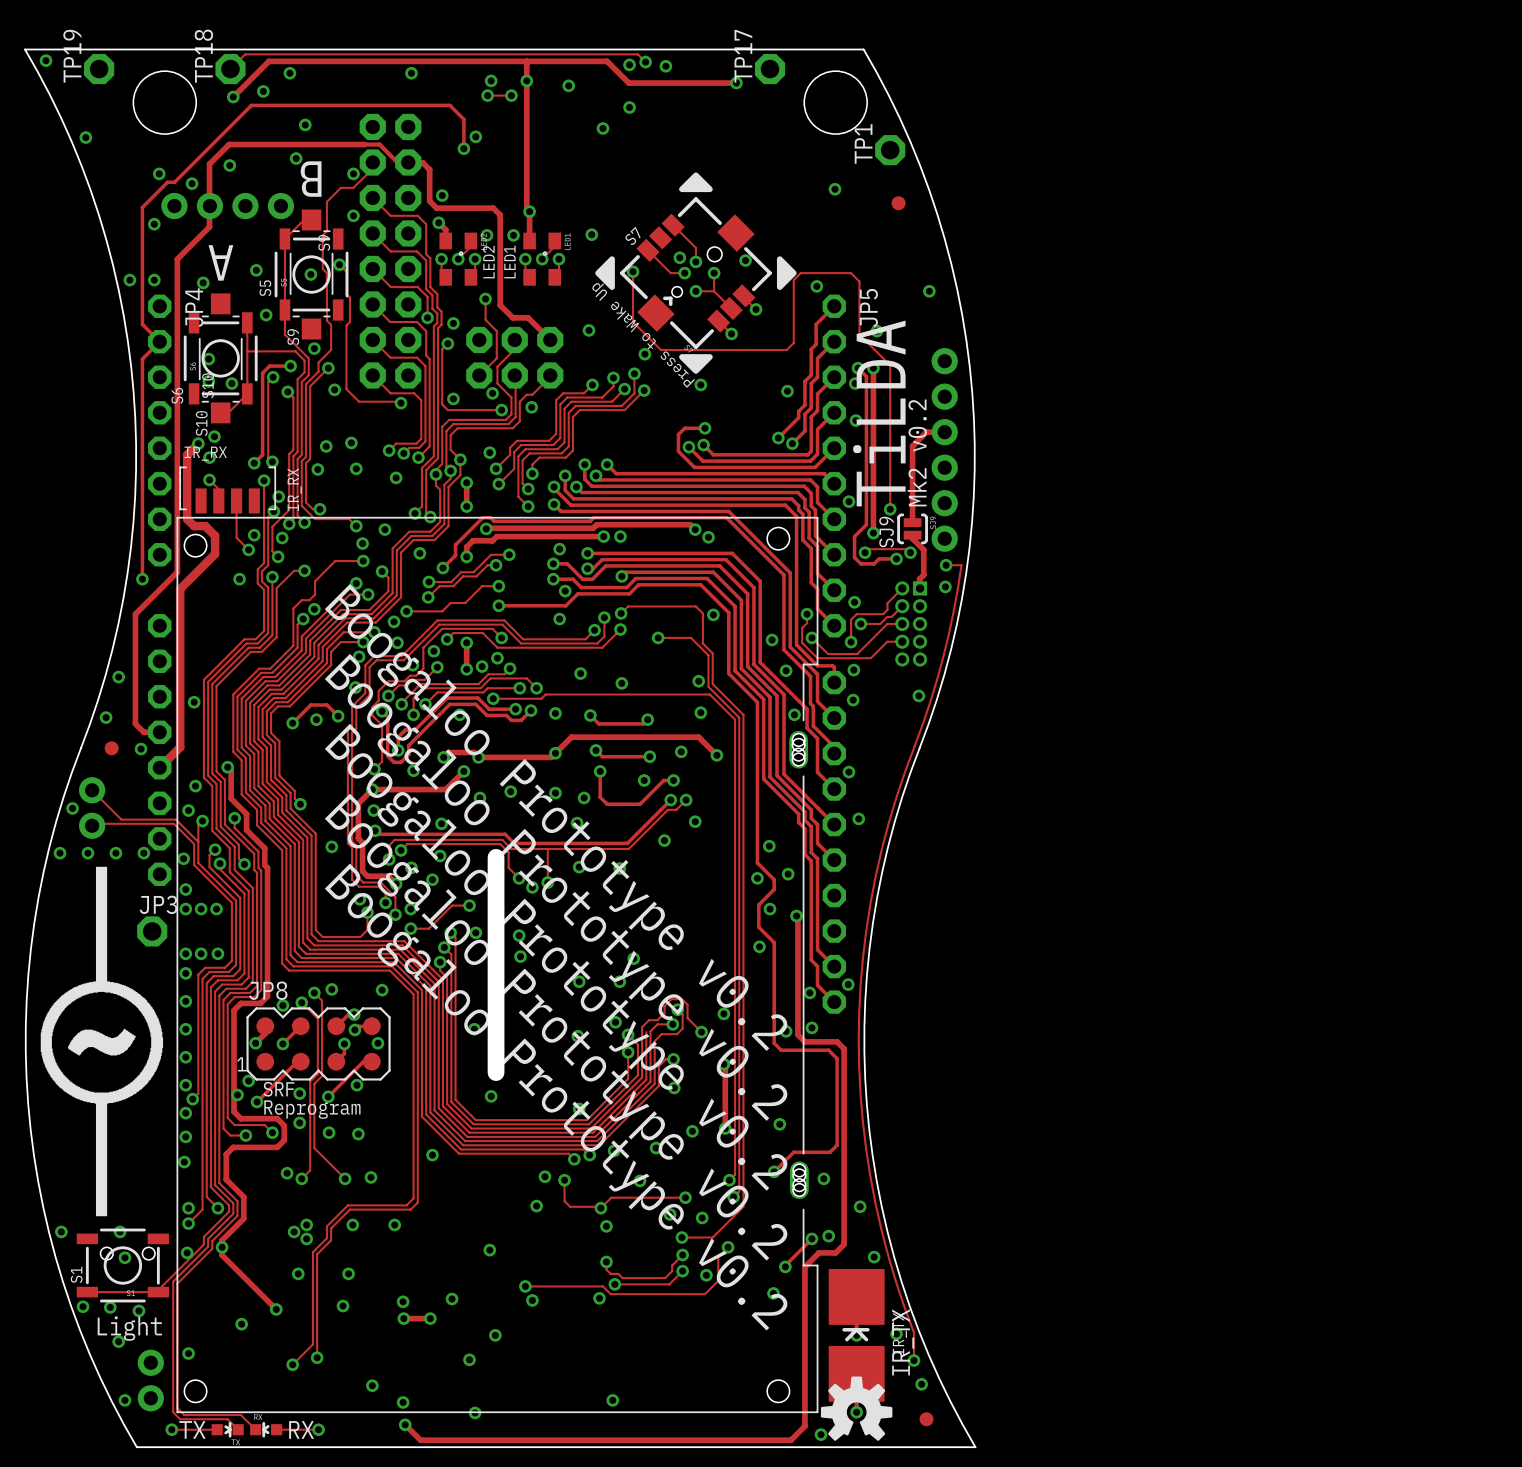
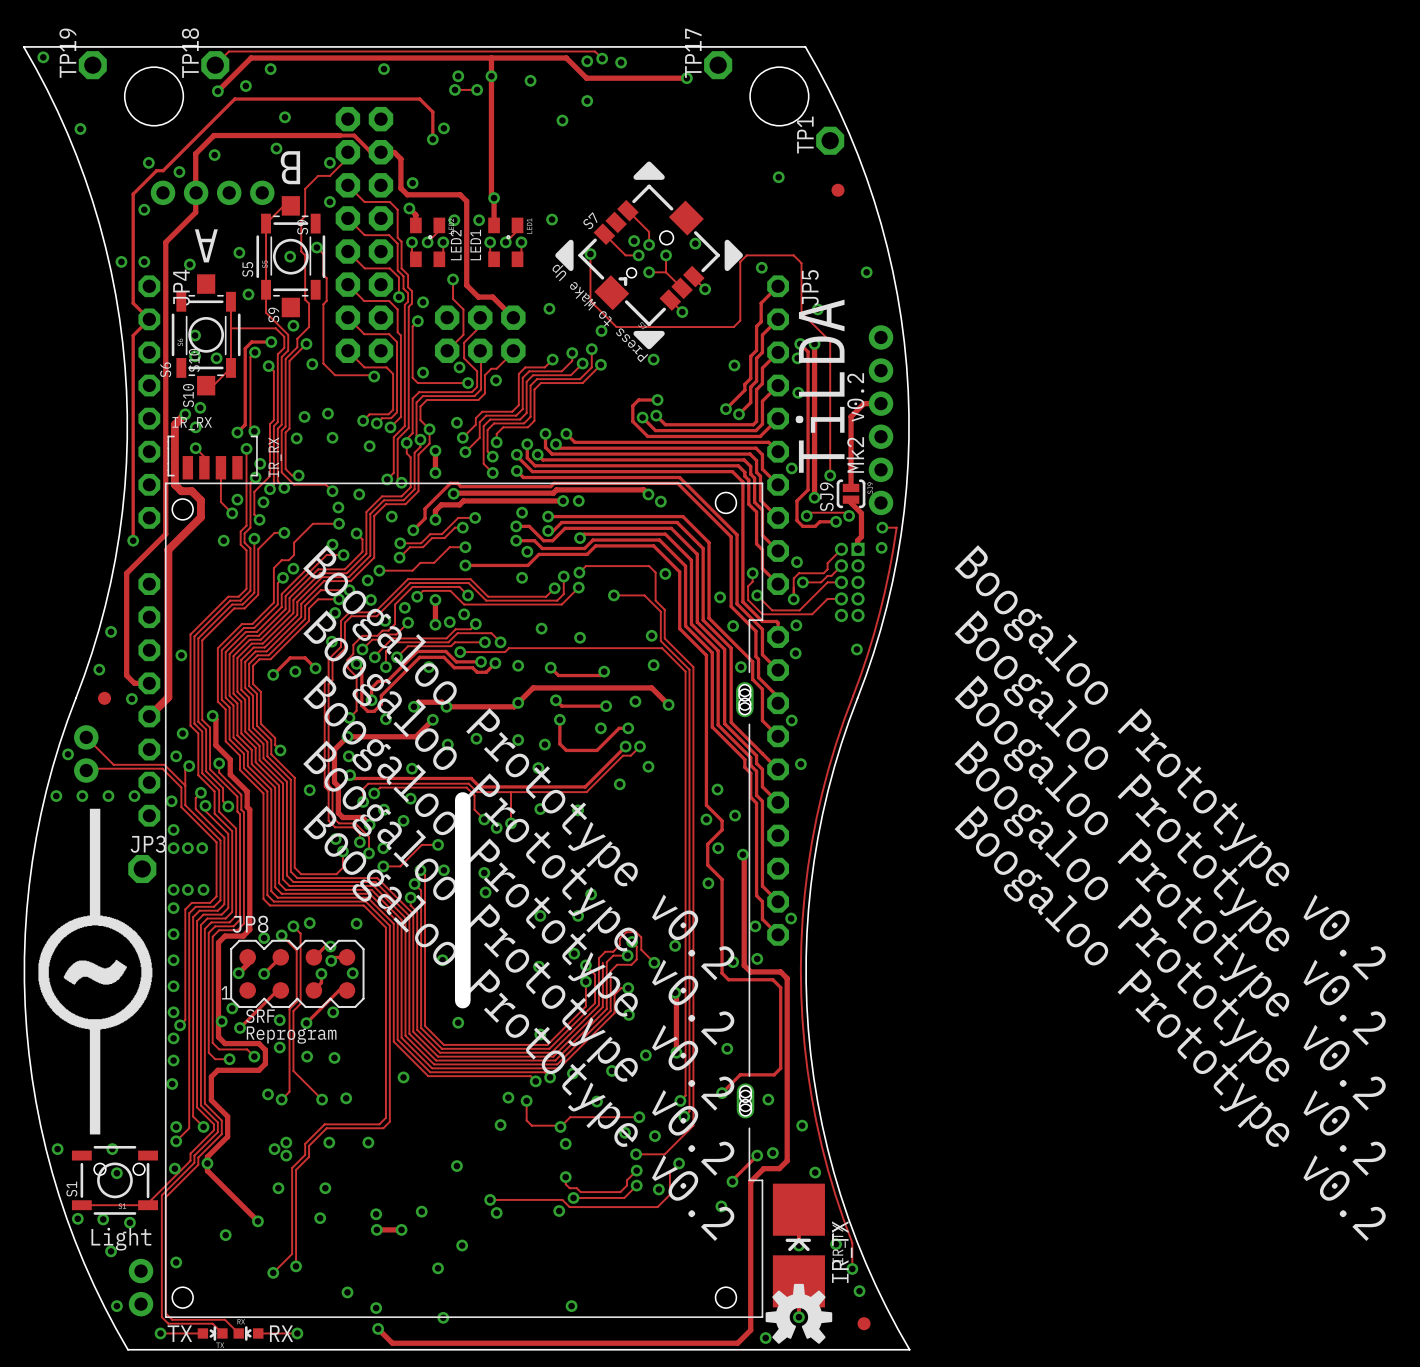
text: none -> Boogaloo Prototype v0.2 (1170, 762)
text: none -> Boogaloo Prototype v0.2 (1170, 827)
text: none -> Boogaloo Prototype v0.2 (1170, 893)
text: none -> Boogaloo Prototype v0.2 (1170, 958)
text: none -> Boogaloo Prototype v0.2 (1170, 1023)

